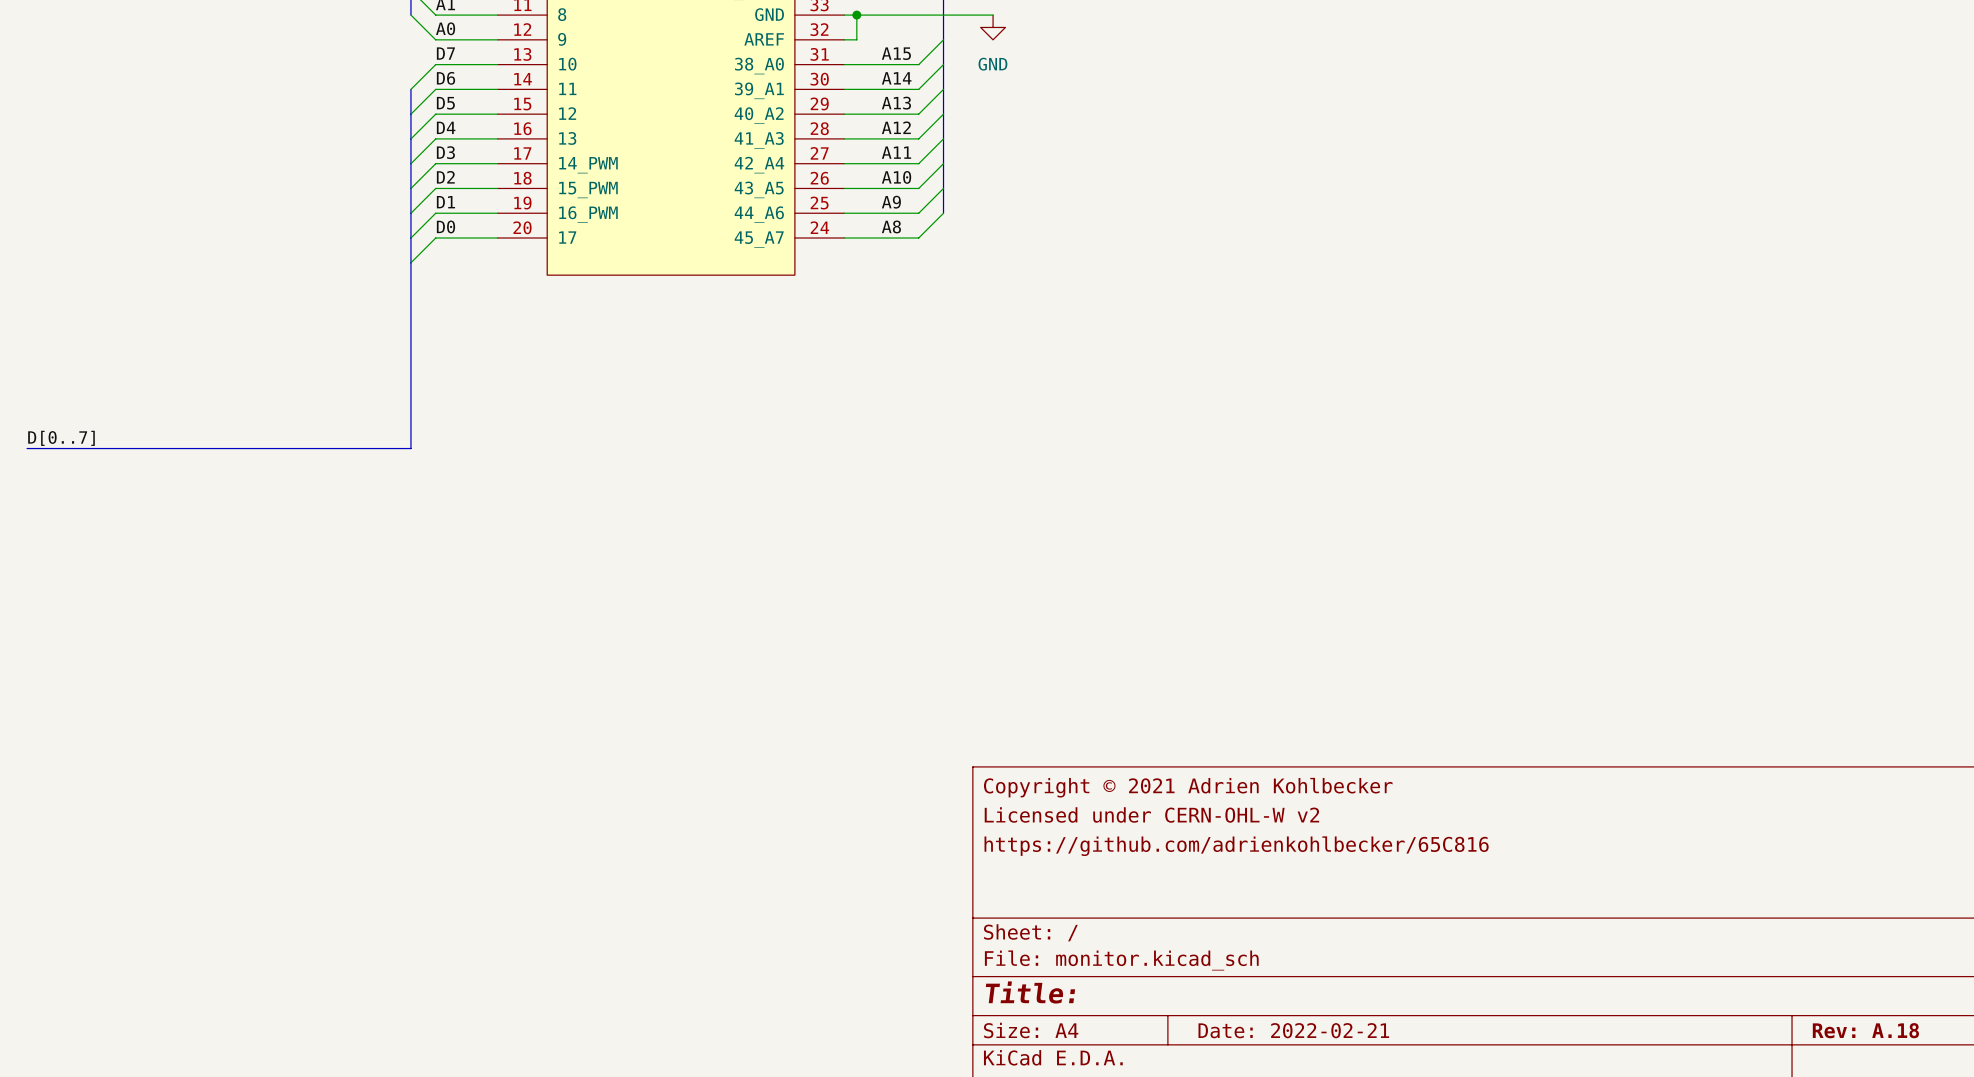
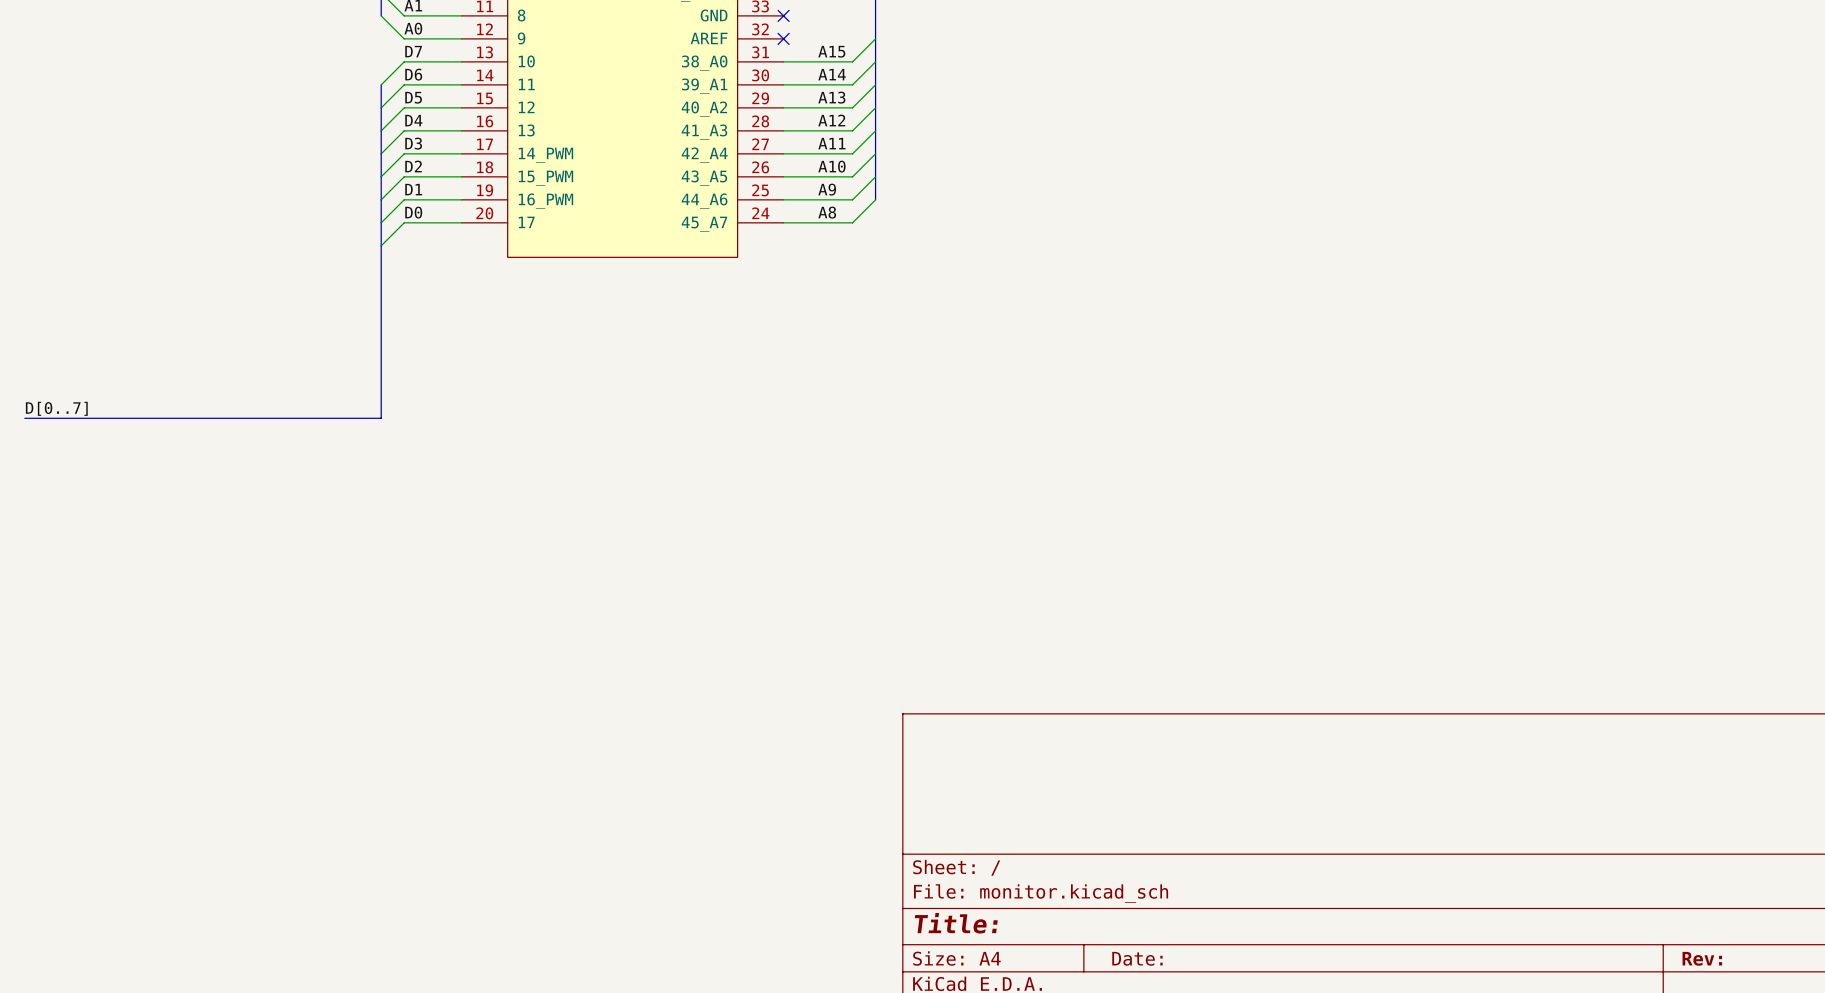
wire: (844, 15) (993, 15) -> none
no-connect mark: none -> (783, 15)
wire: (856, 15) (856, 39) (844, 39) -> none
junction: (856, 15) -> none
power symbol: GND (993, 27) -> none
no-connect mark: none -> (783, 38)
title block: Copyright © 2021 Adrien Kohlbecker (1188, 787) -> none
title block: Licensed under CERN-OHL-W v2 (1151, 814) -> none
title block: https://github.com/adrienkohlbecker/65C816 (1236, 846) -> none
title block: Date: 2022-02-21 (1293, 1030) -> Date: (1137, 958)
title block: Rev: A.18 (1865, 1030) -> Rev: (1702, 958)

